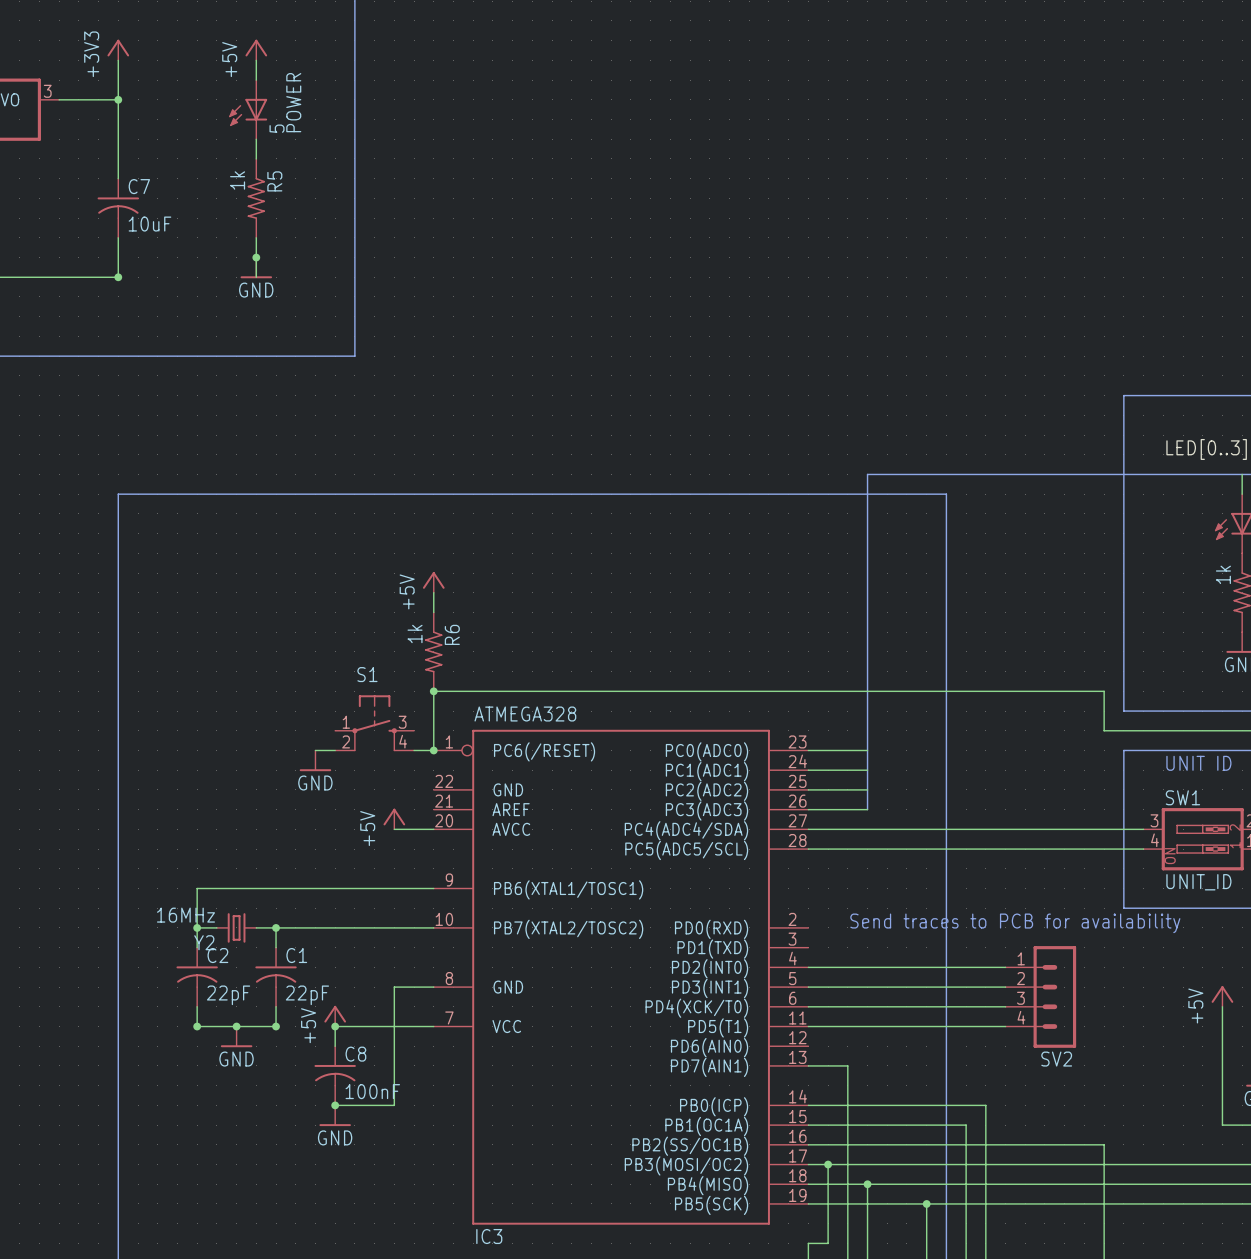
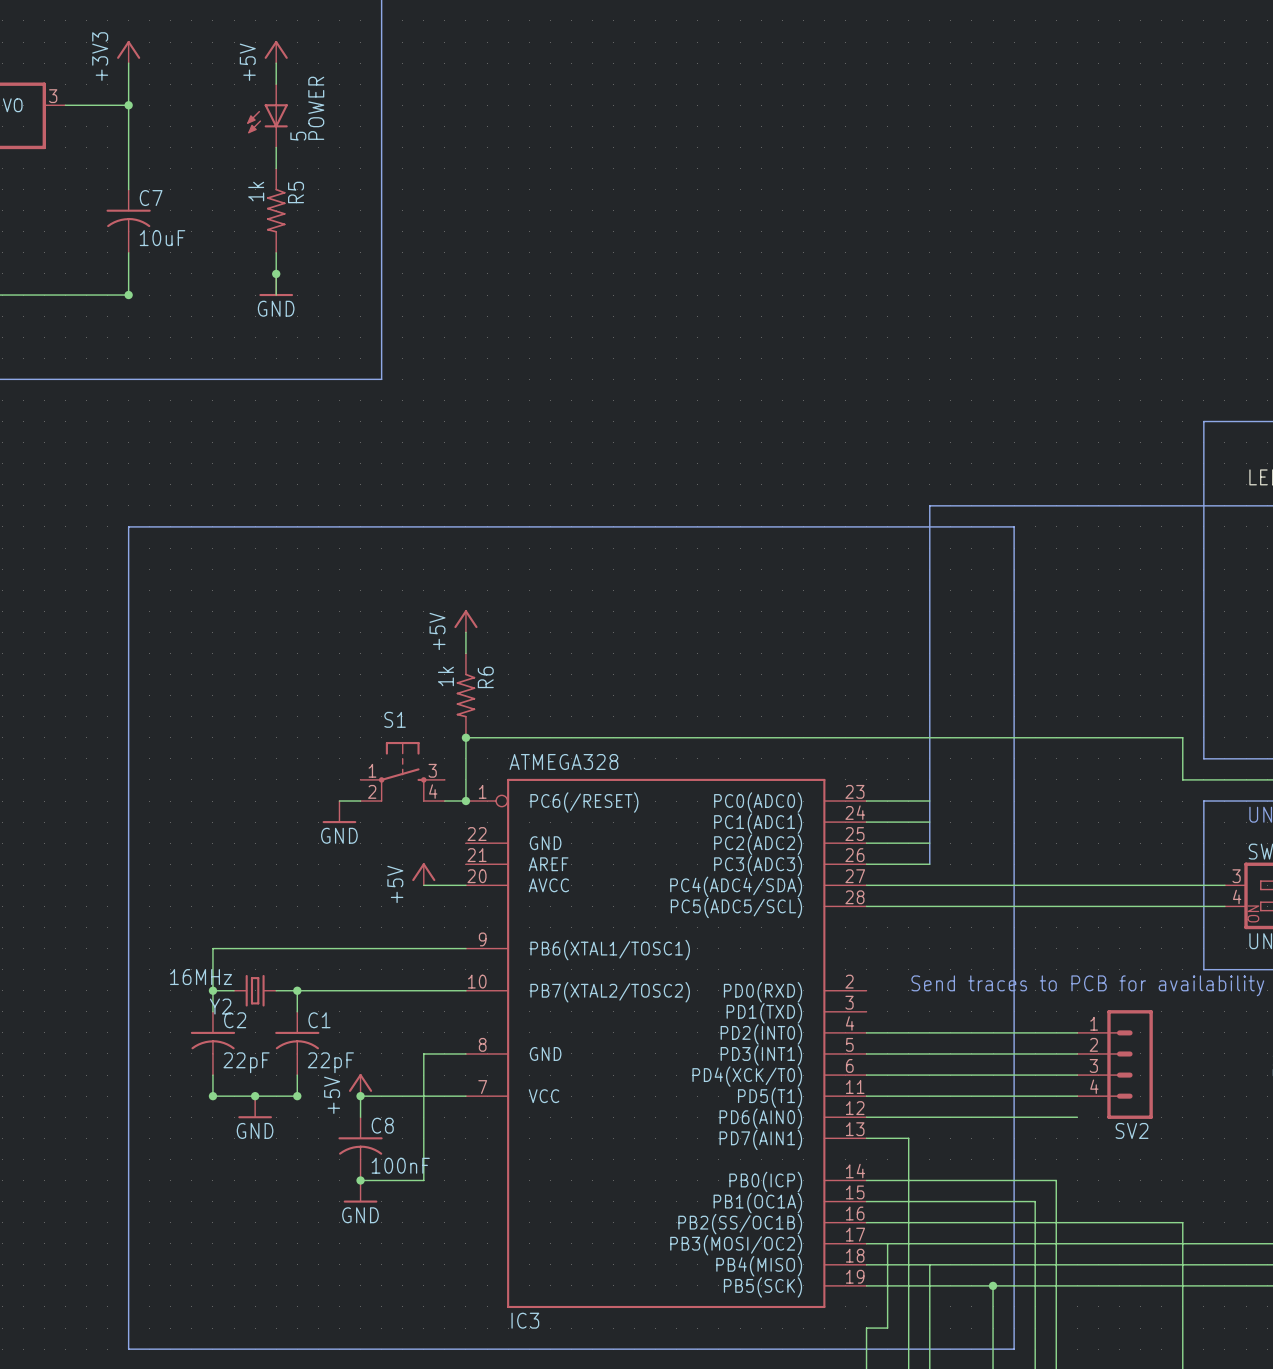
wire: none -> (866, 1117) (1077, 1117)
junction: (828, 1164) -> none
junction: (867, 1184) -> none

